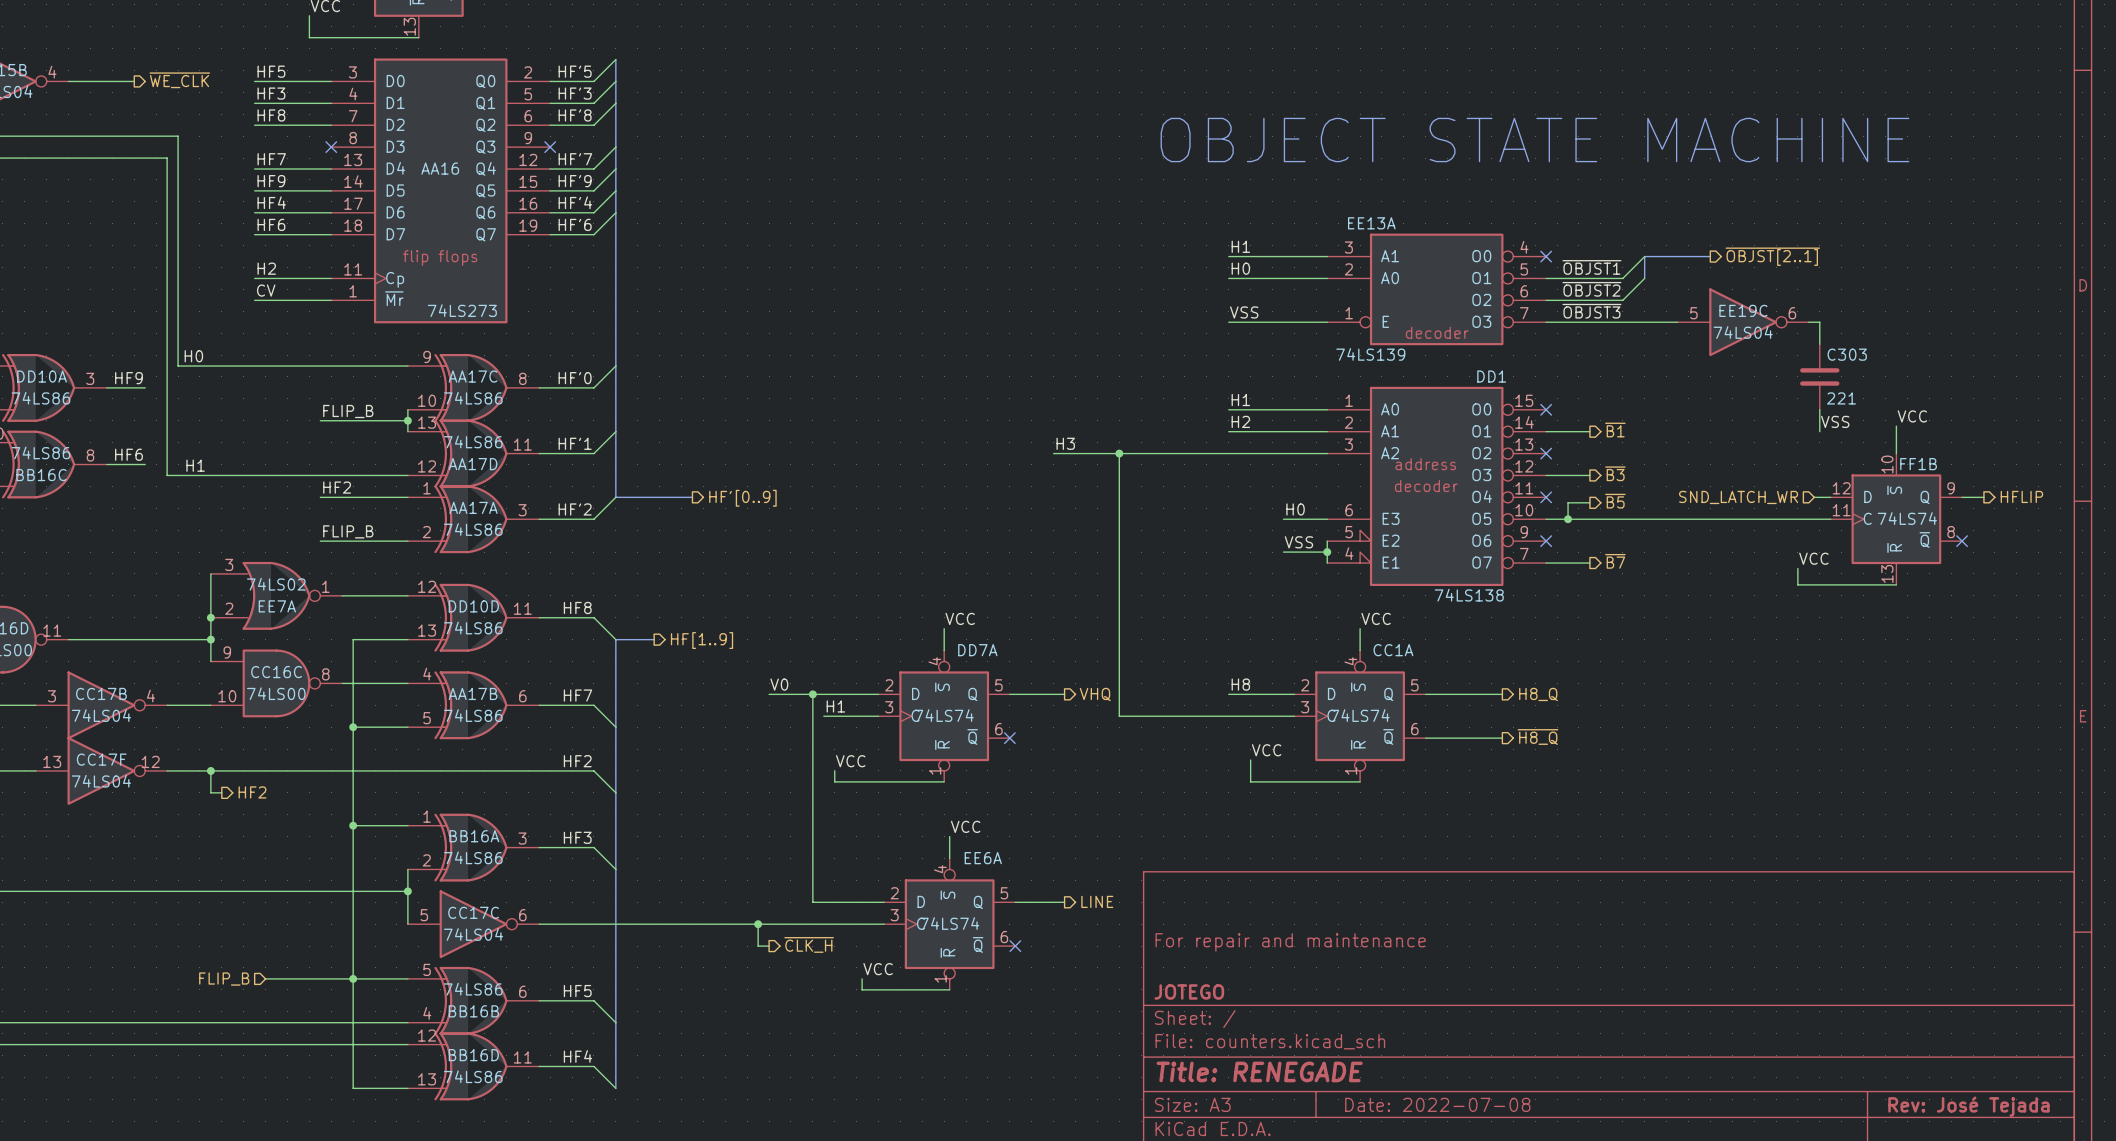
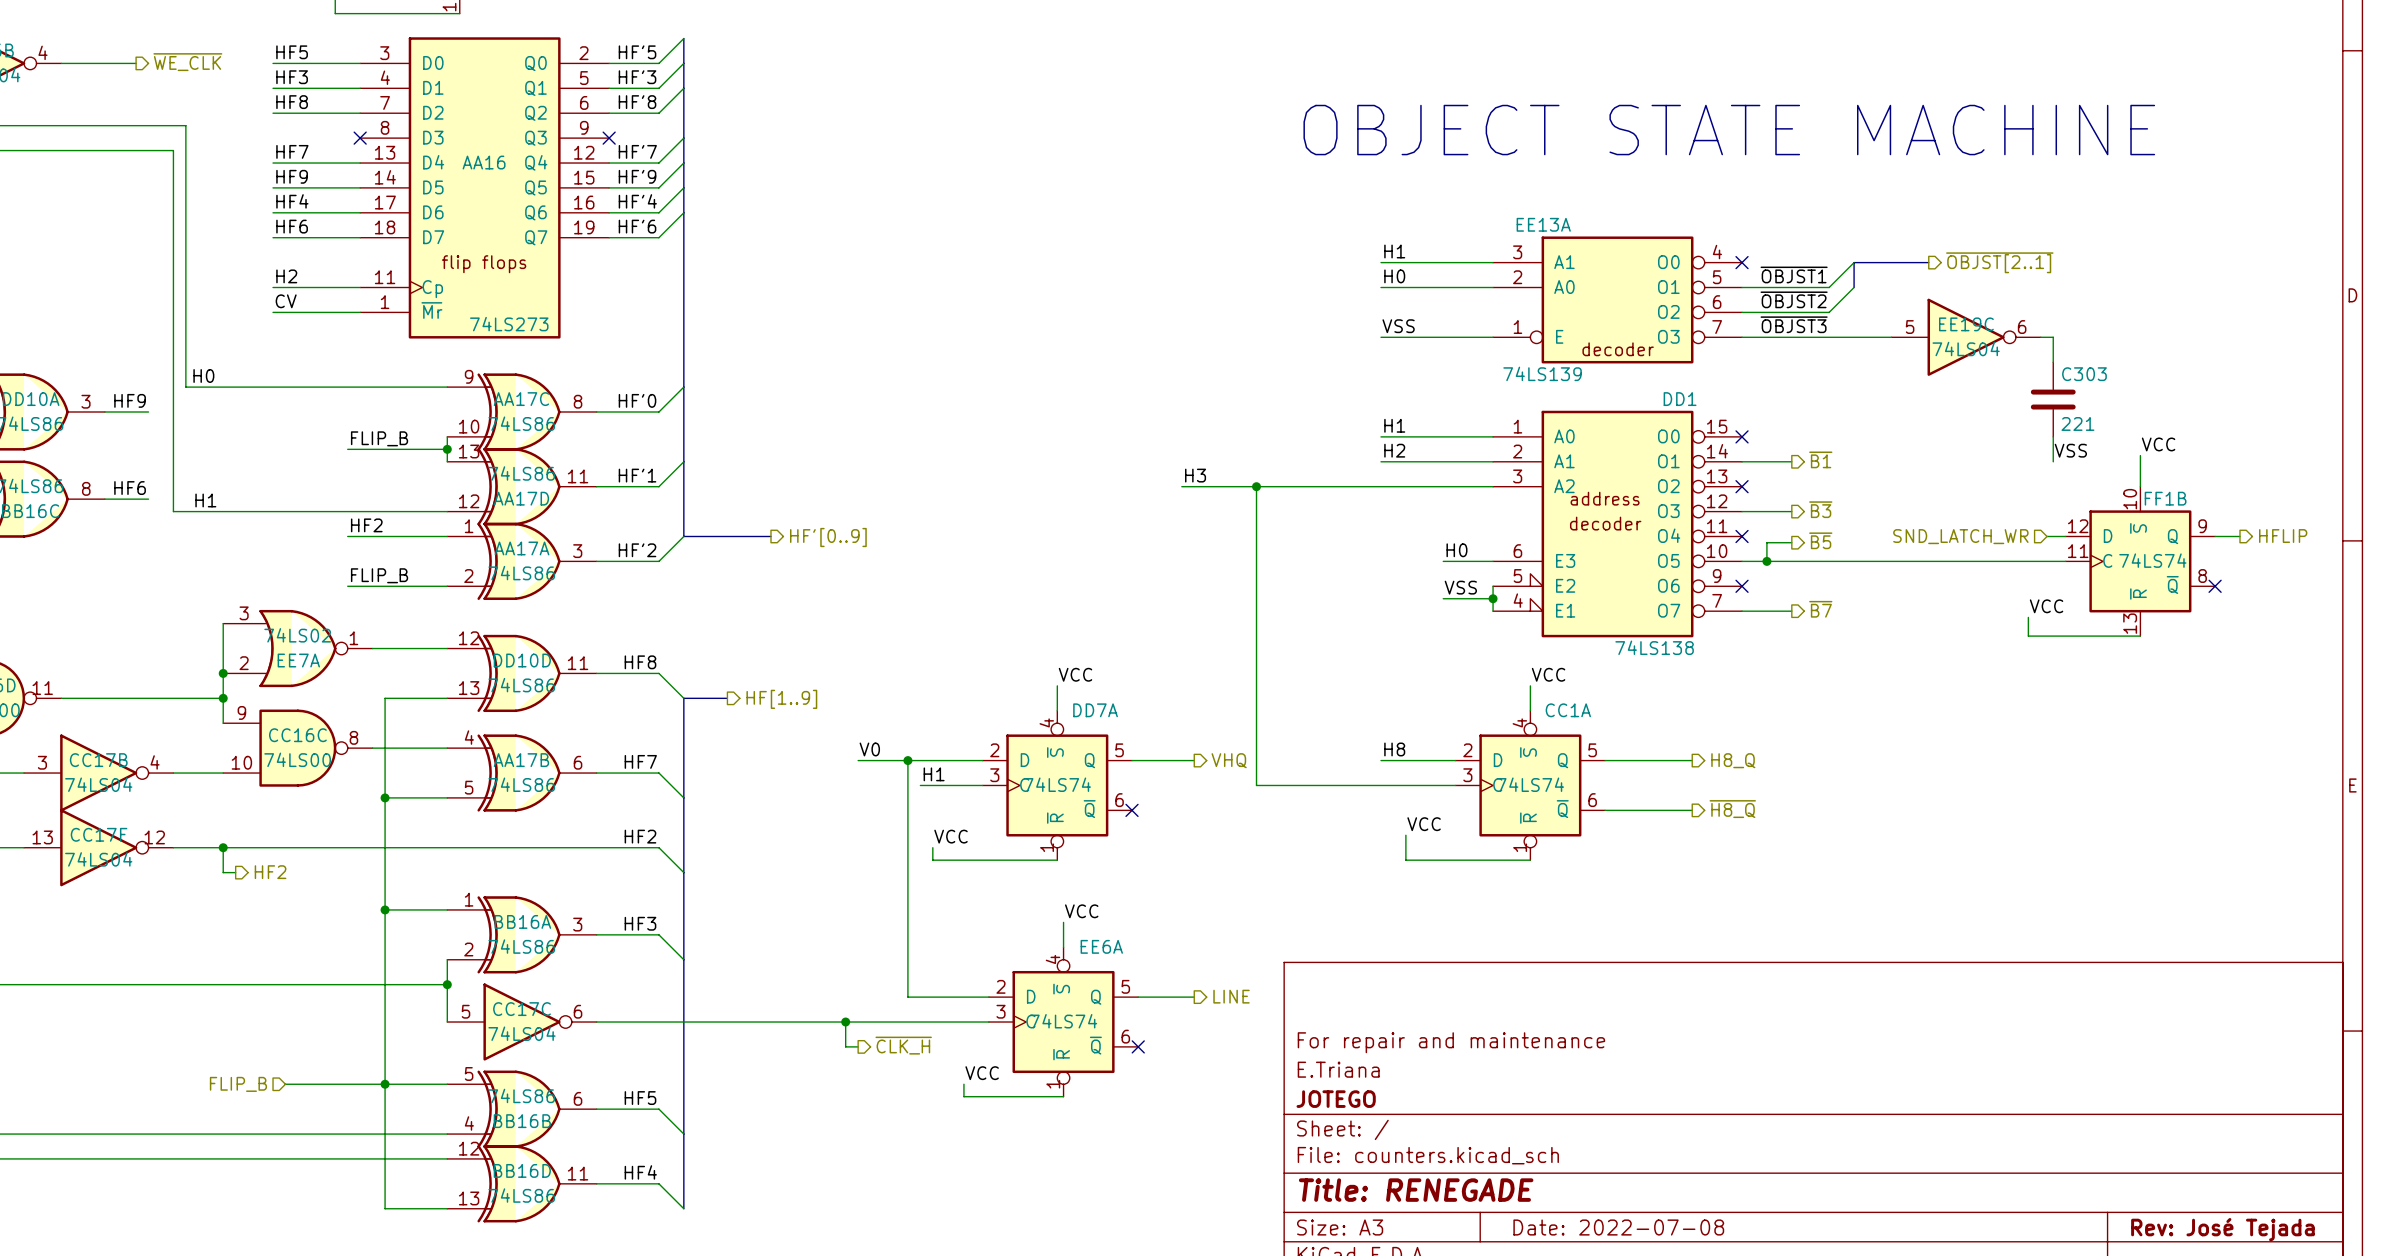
title block: none -> E.Triana (1338, 1069)

